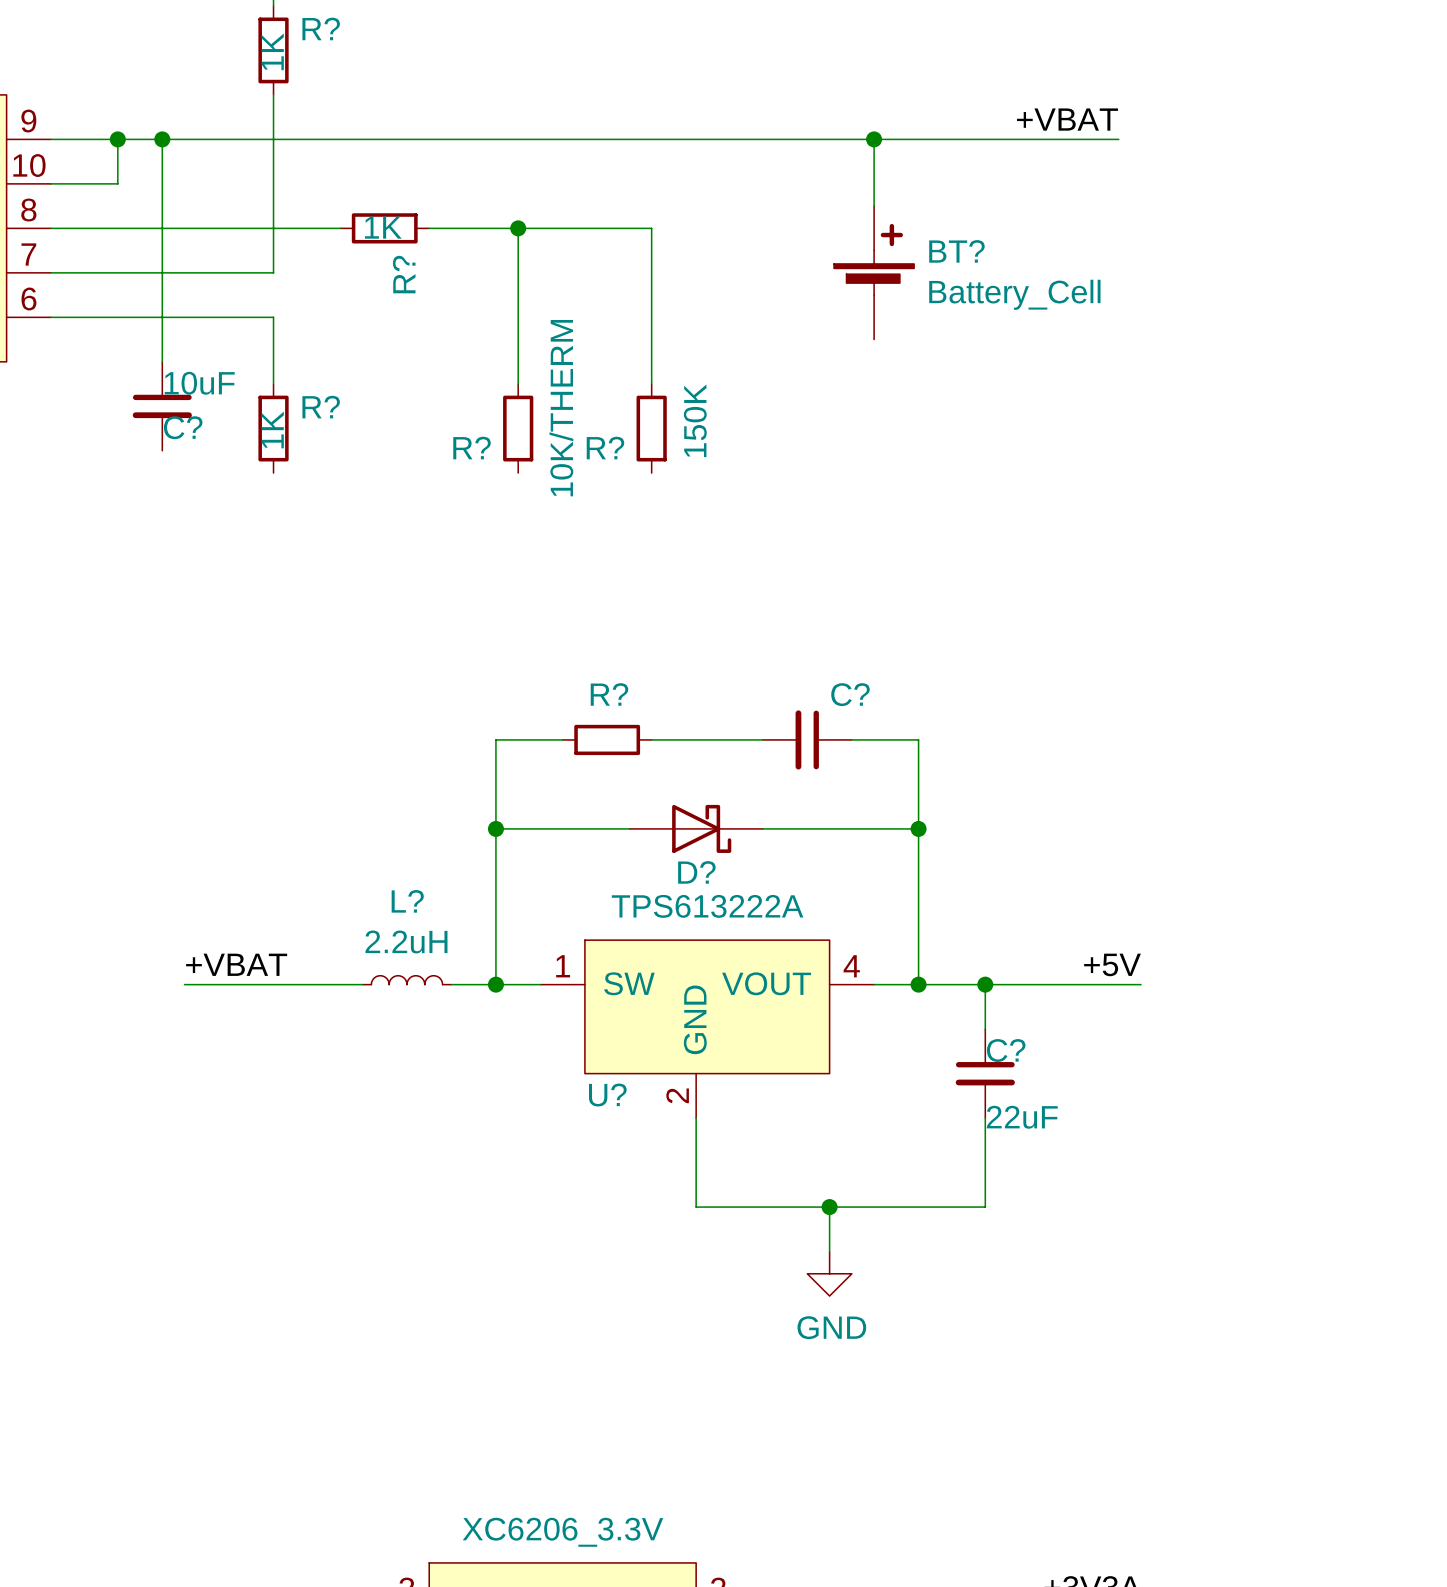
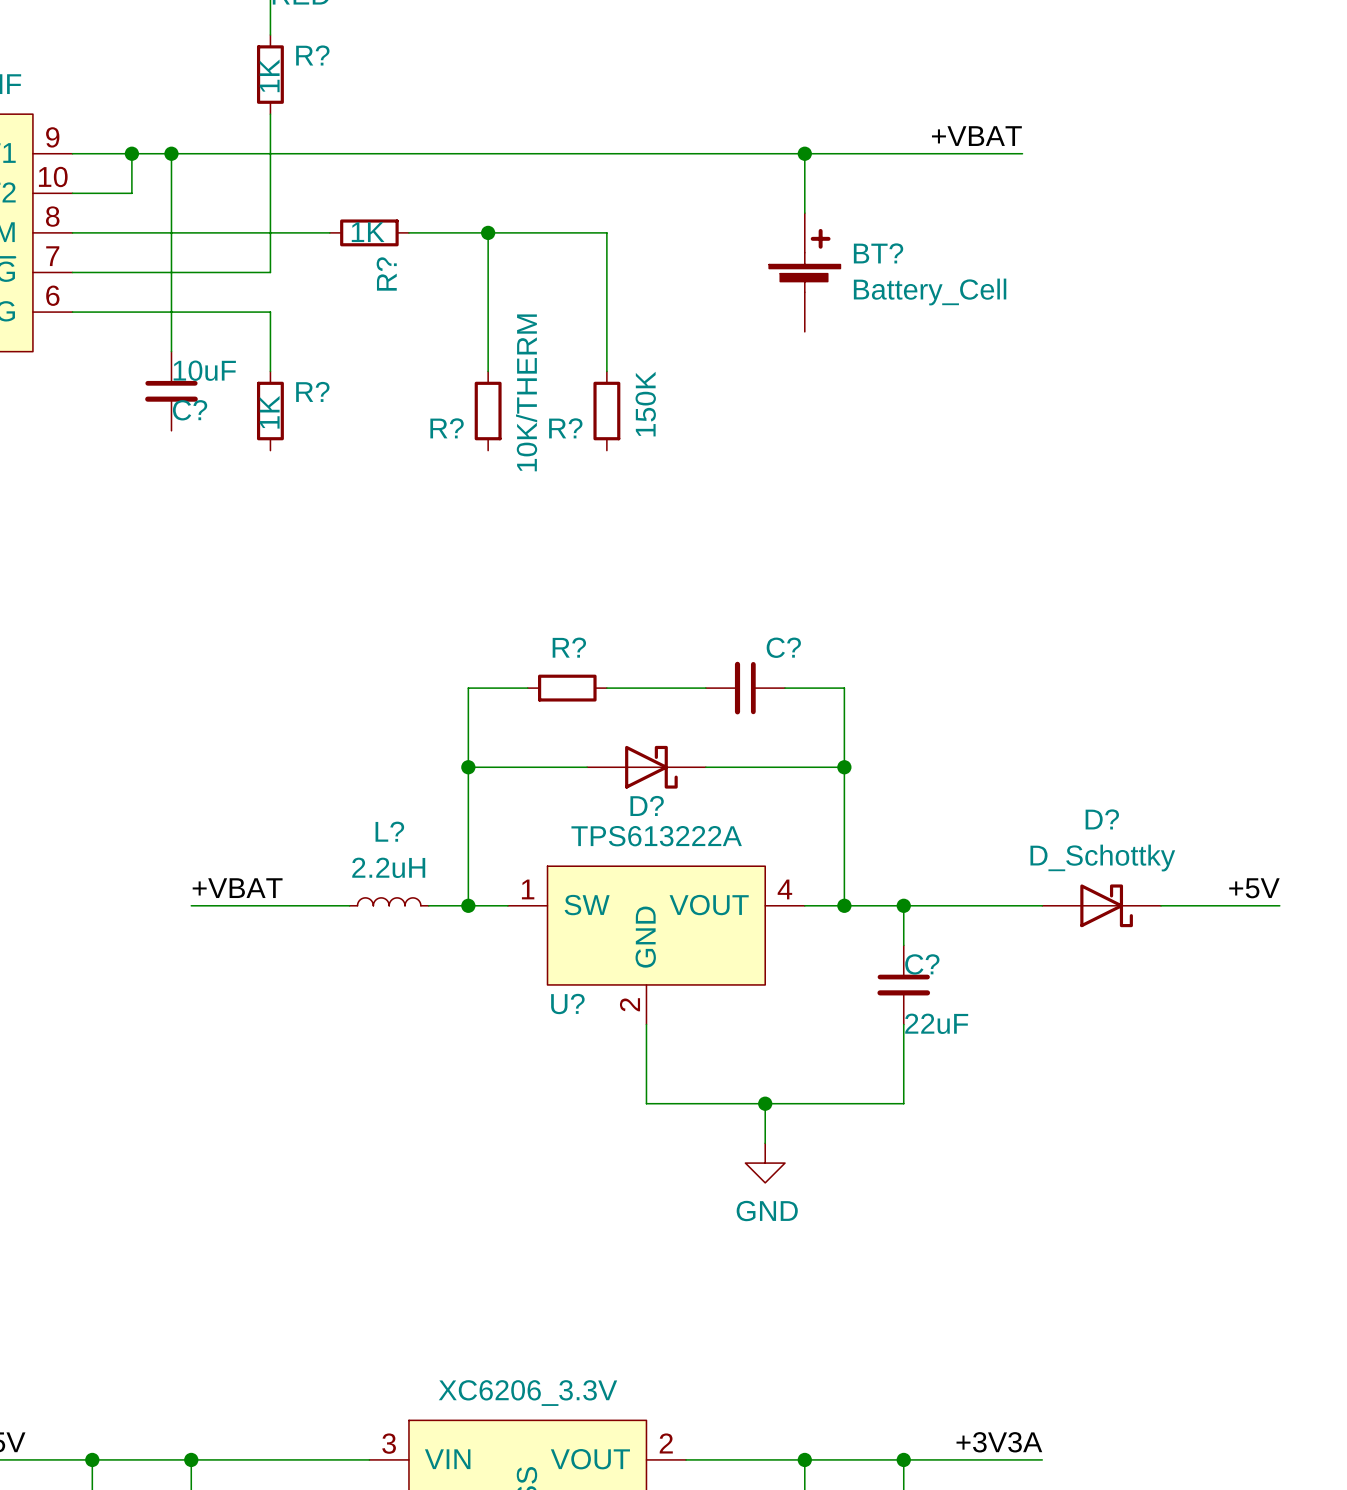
label position: +5V (1112, 964) -> +5V (1254, 888)
D?: none -> D_Schottky (1101, 905)
wire: none -> (1161, 905) (1279, 905)

